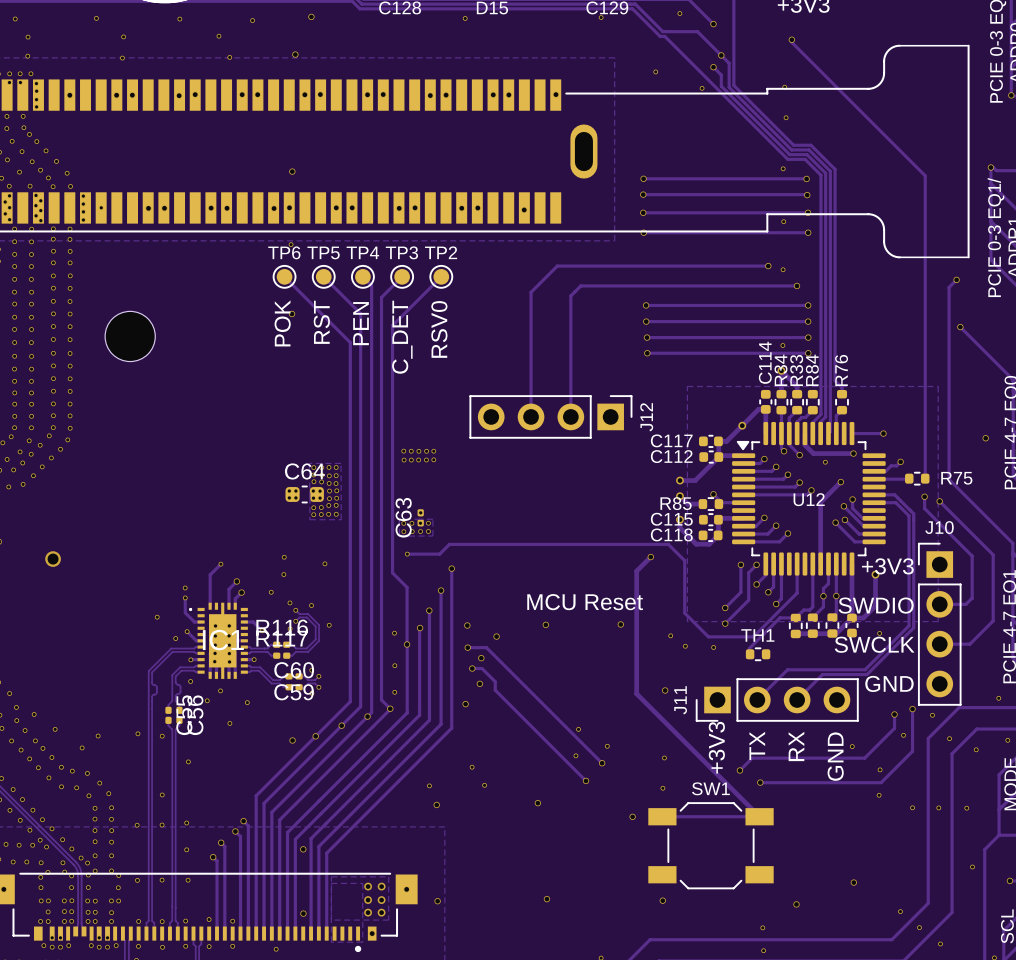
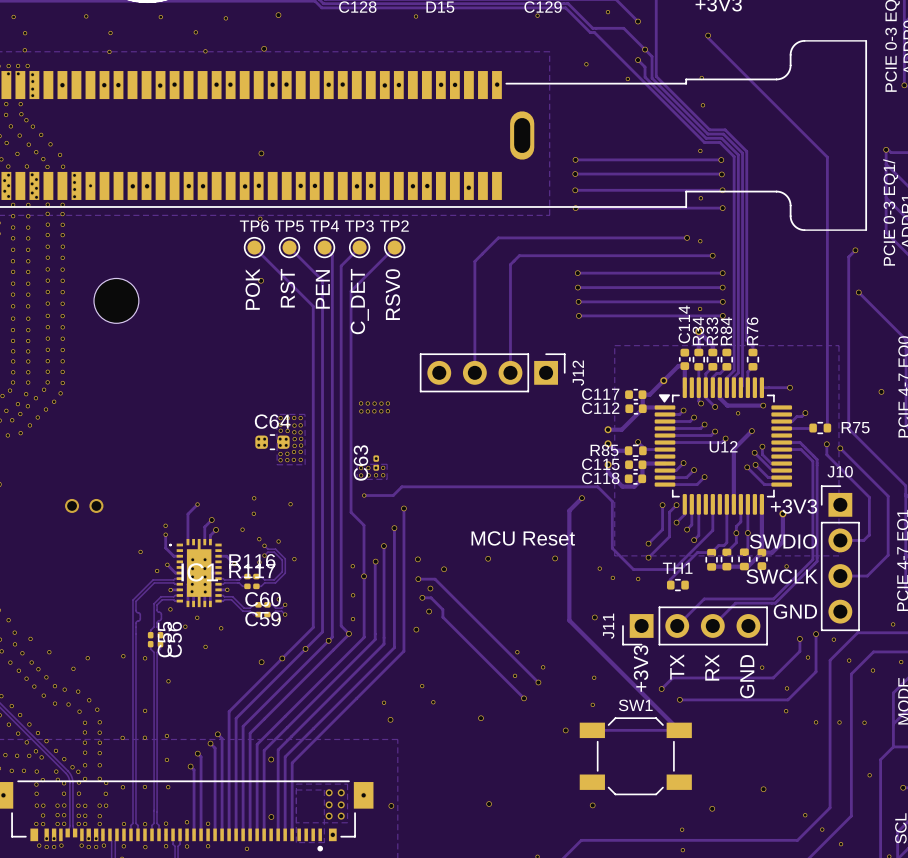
via: (53, 559) -> none
via: none -> (72, 505)
via: none -> (96, 505)

